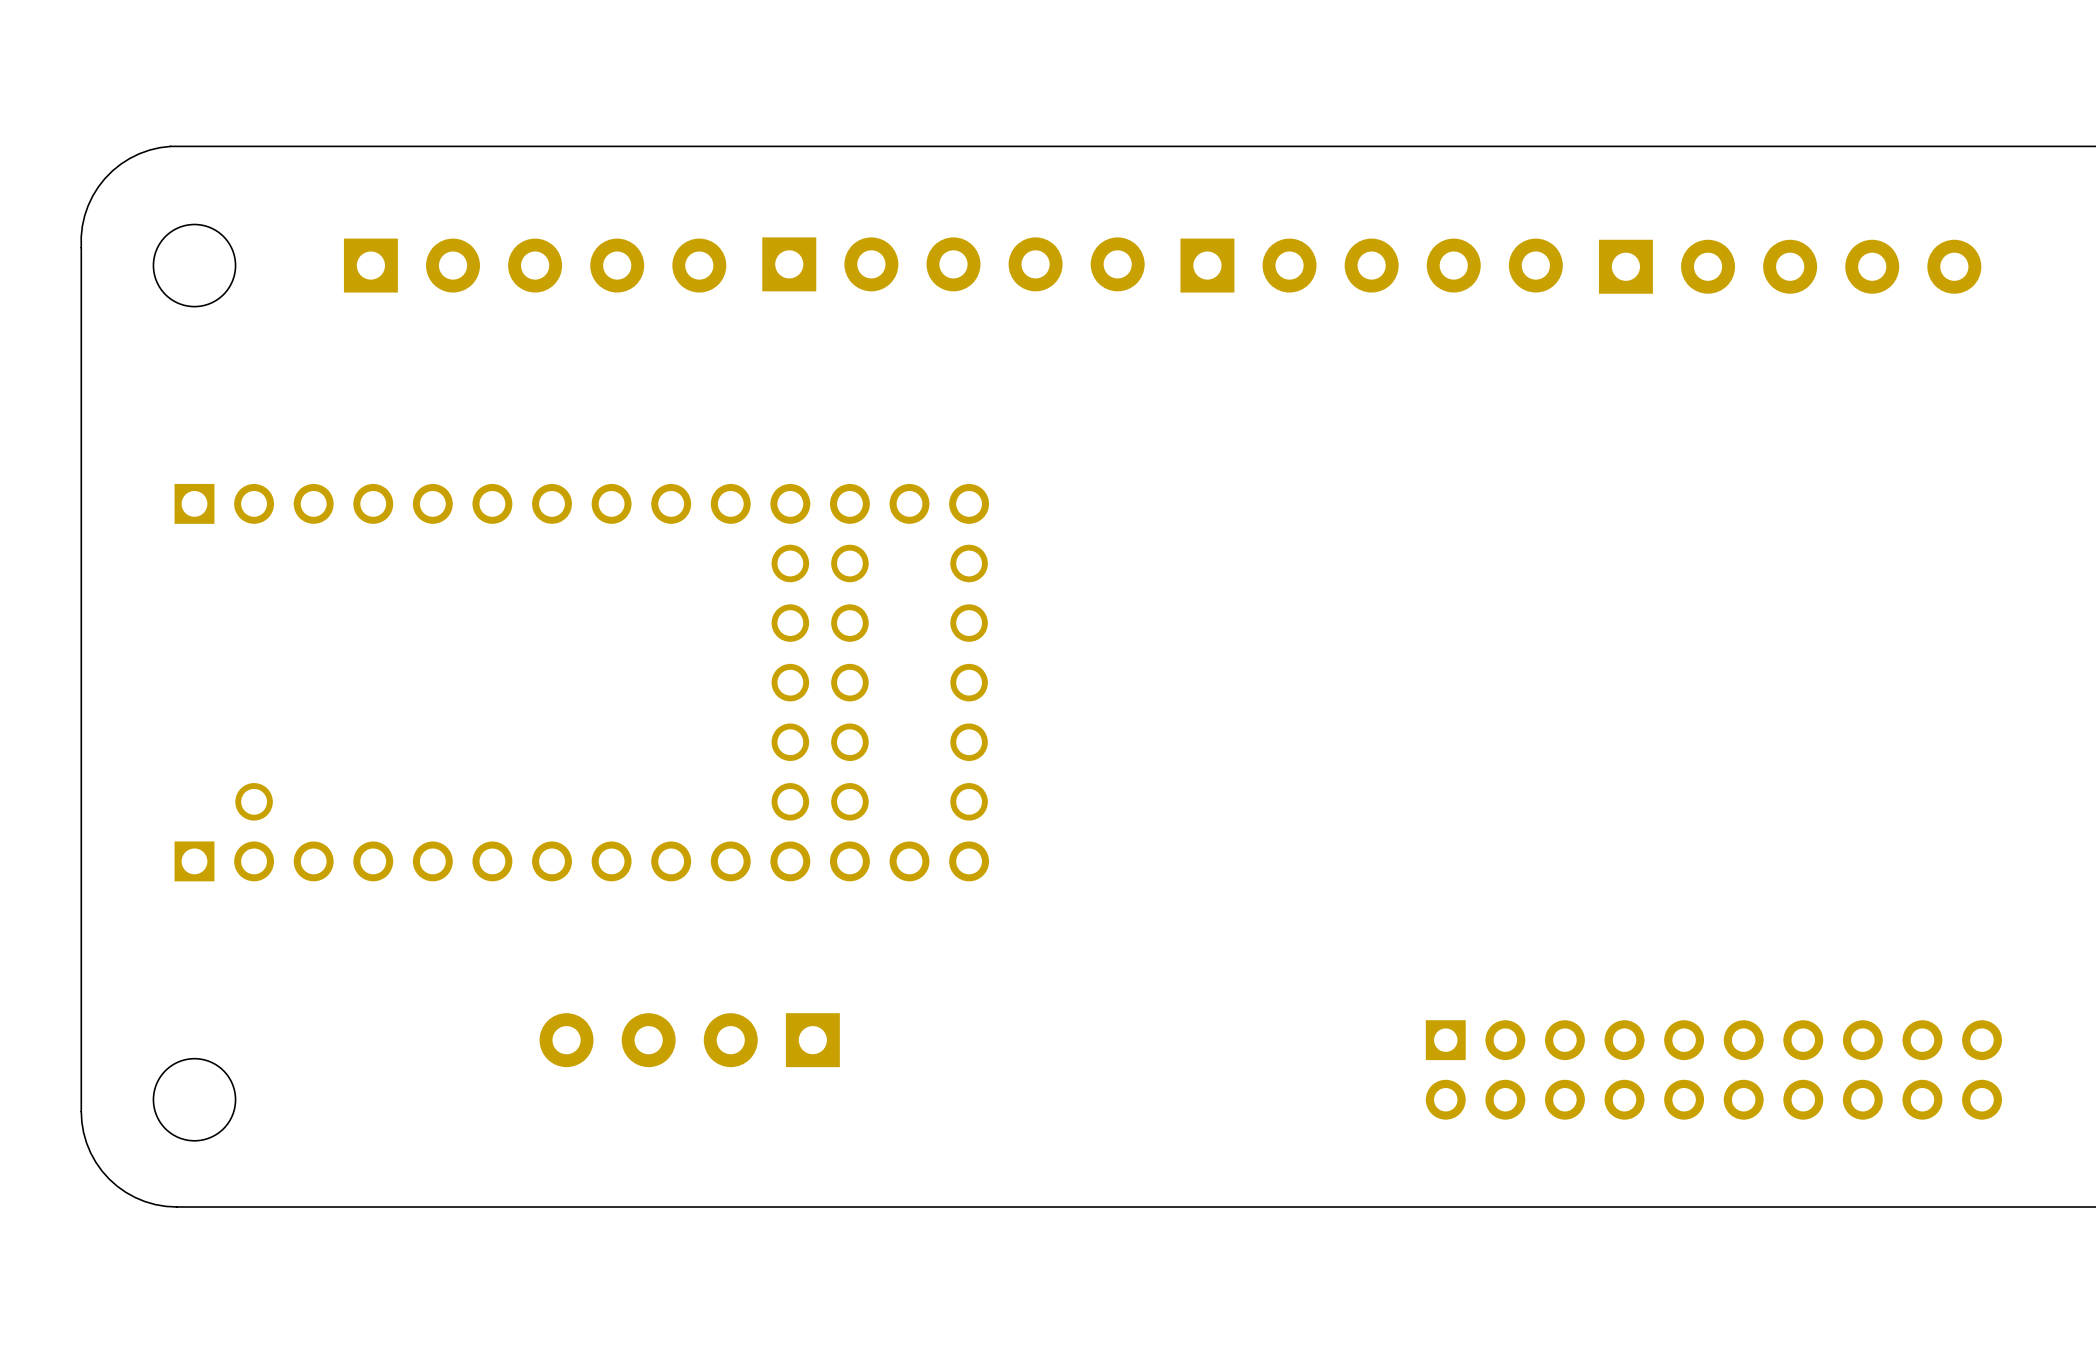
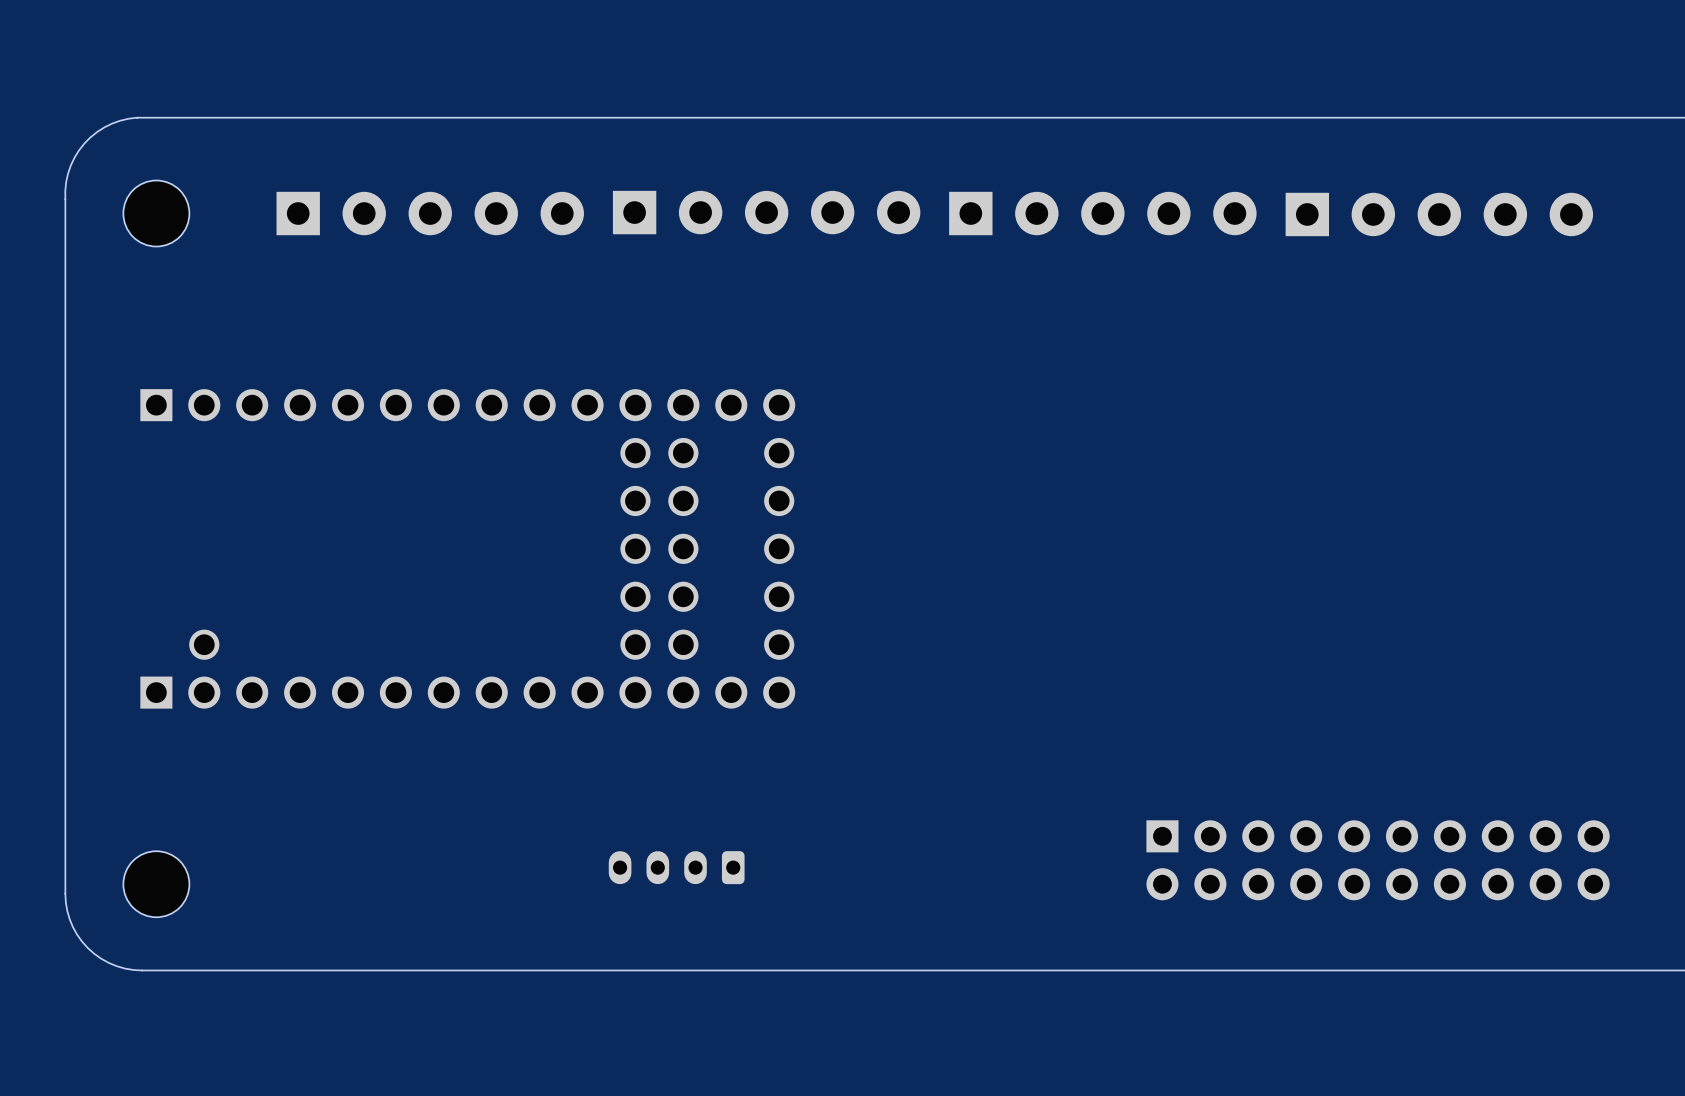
part: (689, 1040) -> none
part: none -> (676, 867)

